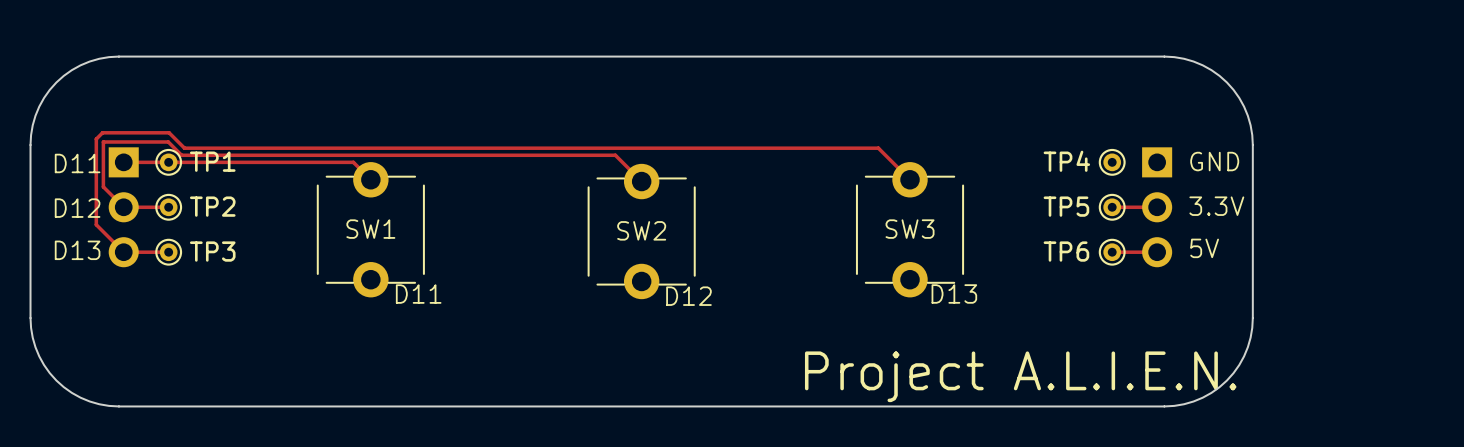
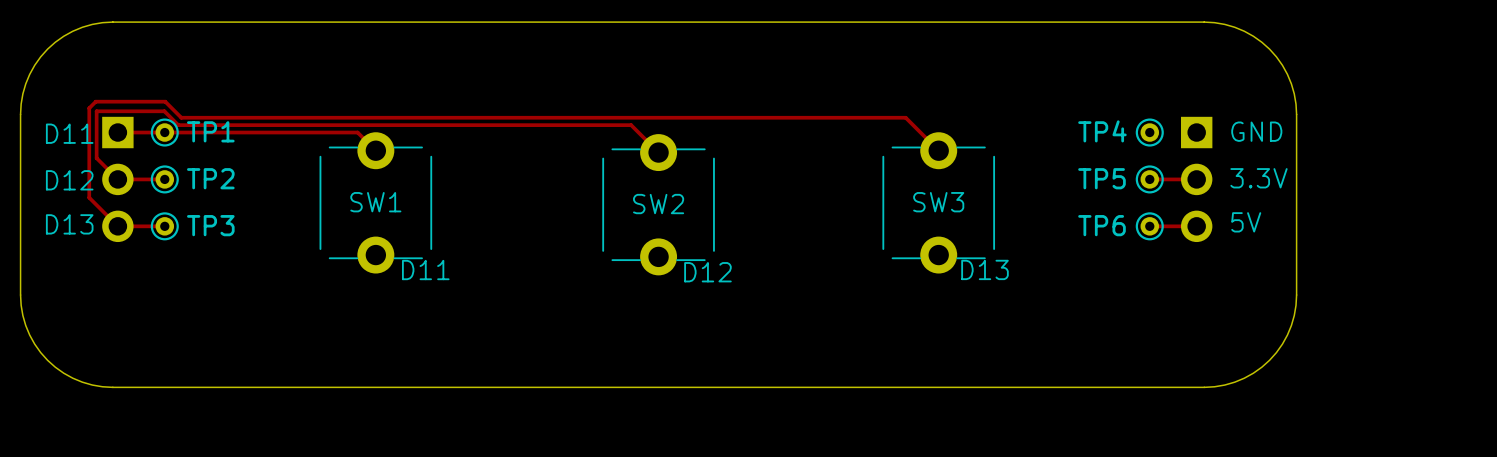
text: Project A.L.I.E.N. (1020, 376) -> none

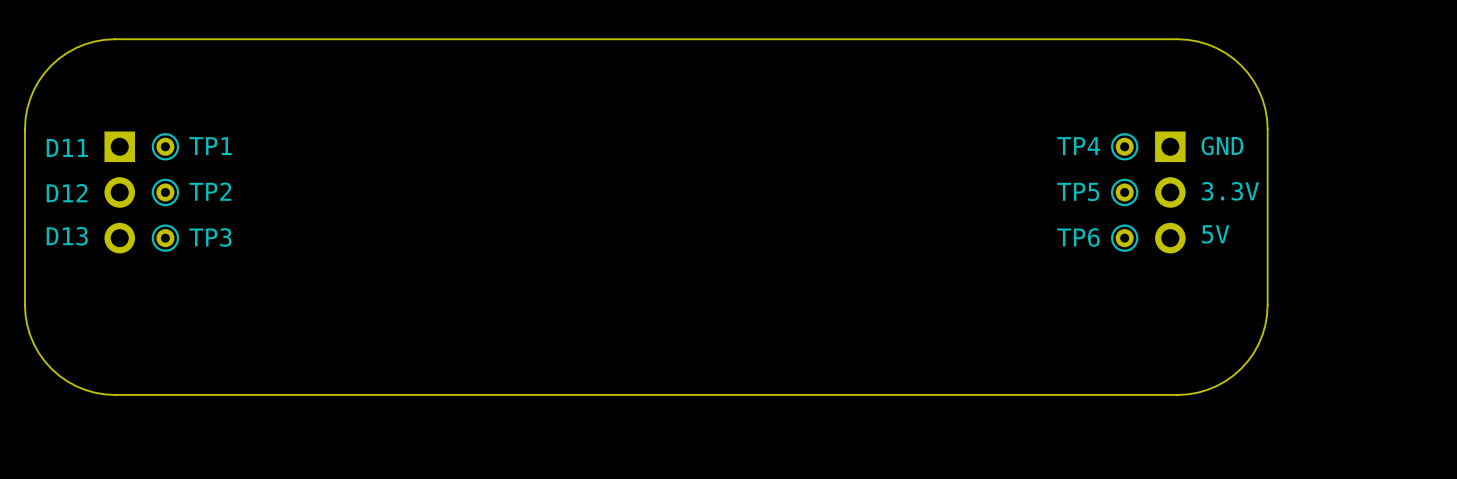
top track: (117, 132) (357, 132) (375, 150) -> none
top track: (938, 150) (905, 117) (181, 117) (165, 101) (95, 101) (89, 108) (89, 197) (117, 226) (164, 226) -> none
top track: (658, 152) (631, 125) (178, 125) (164, 111) (96, 111) (96, 158) (117, 179) (164, 179) -> none
top track: (1149, 179) (1196, 179) -> none
SW1: (375, 202) -> none
SW3: (938, 202) -> none
SW2: (658, 204) -> none
top track: (1149, 226) (1196, 226) -> none
text: D13 (984, 269) -> none
text: D11 (425, 270) -> none
text: D12 (707, 272) -> none

